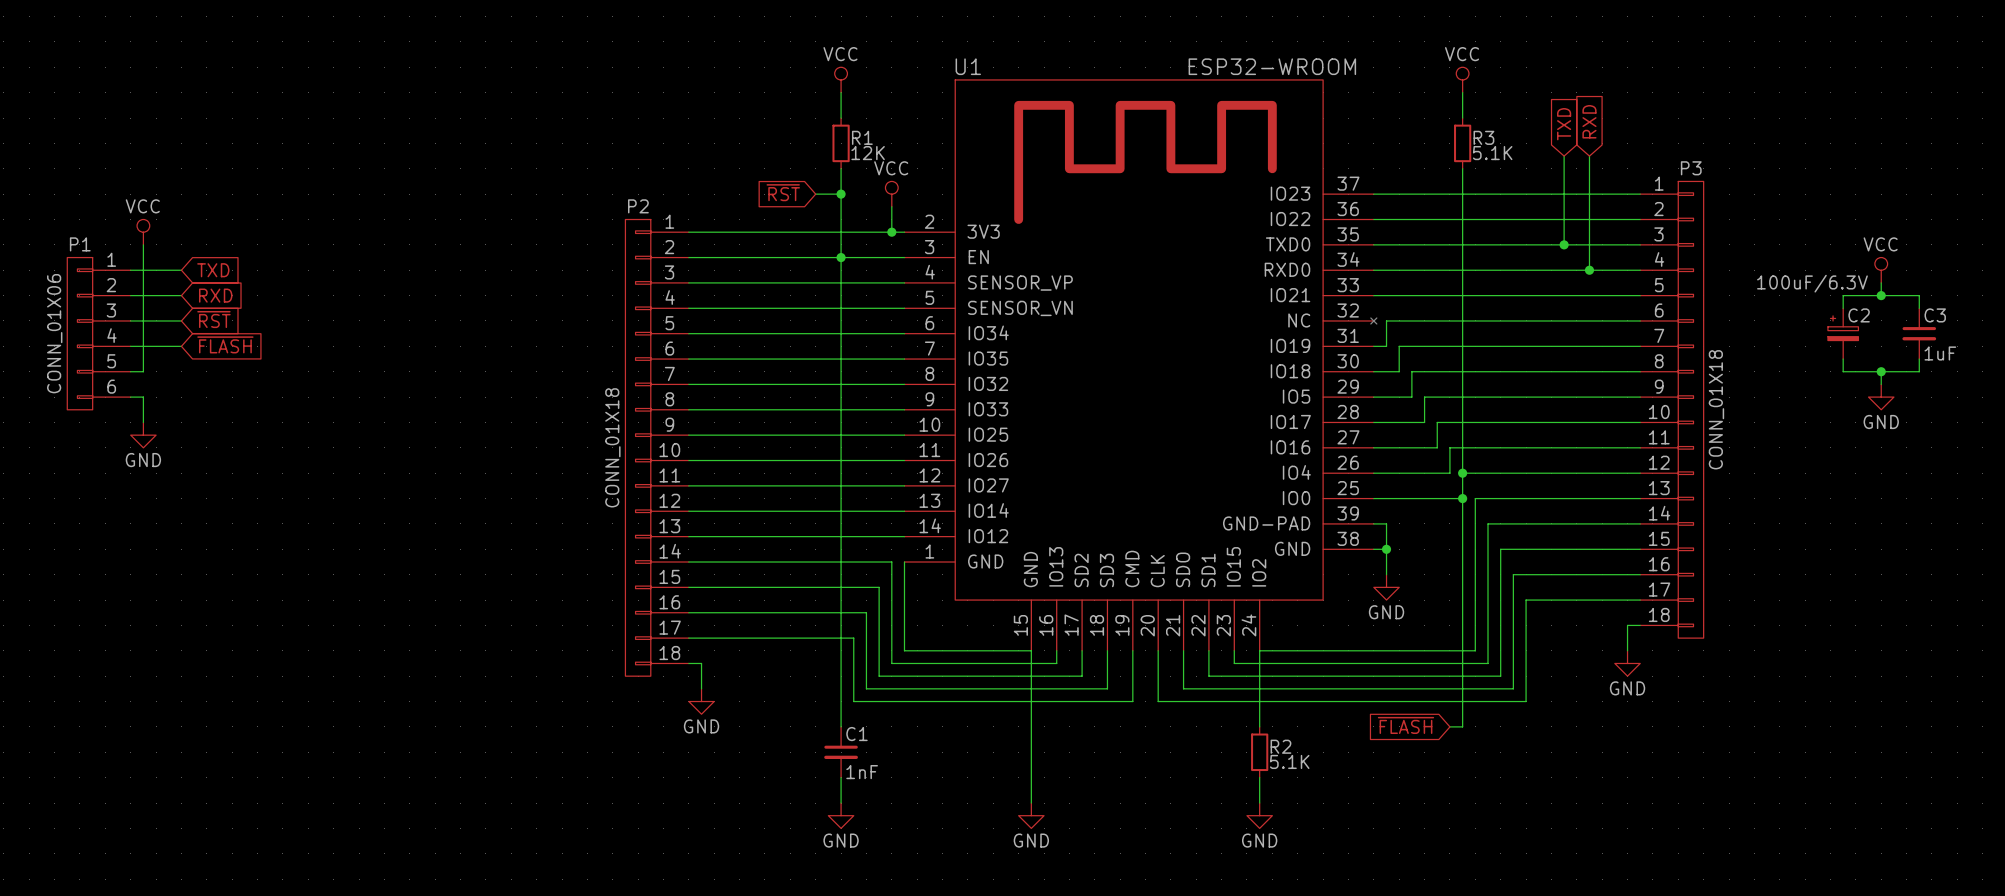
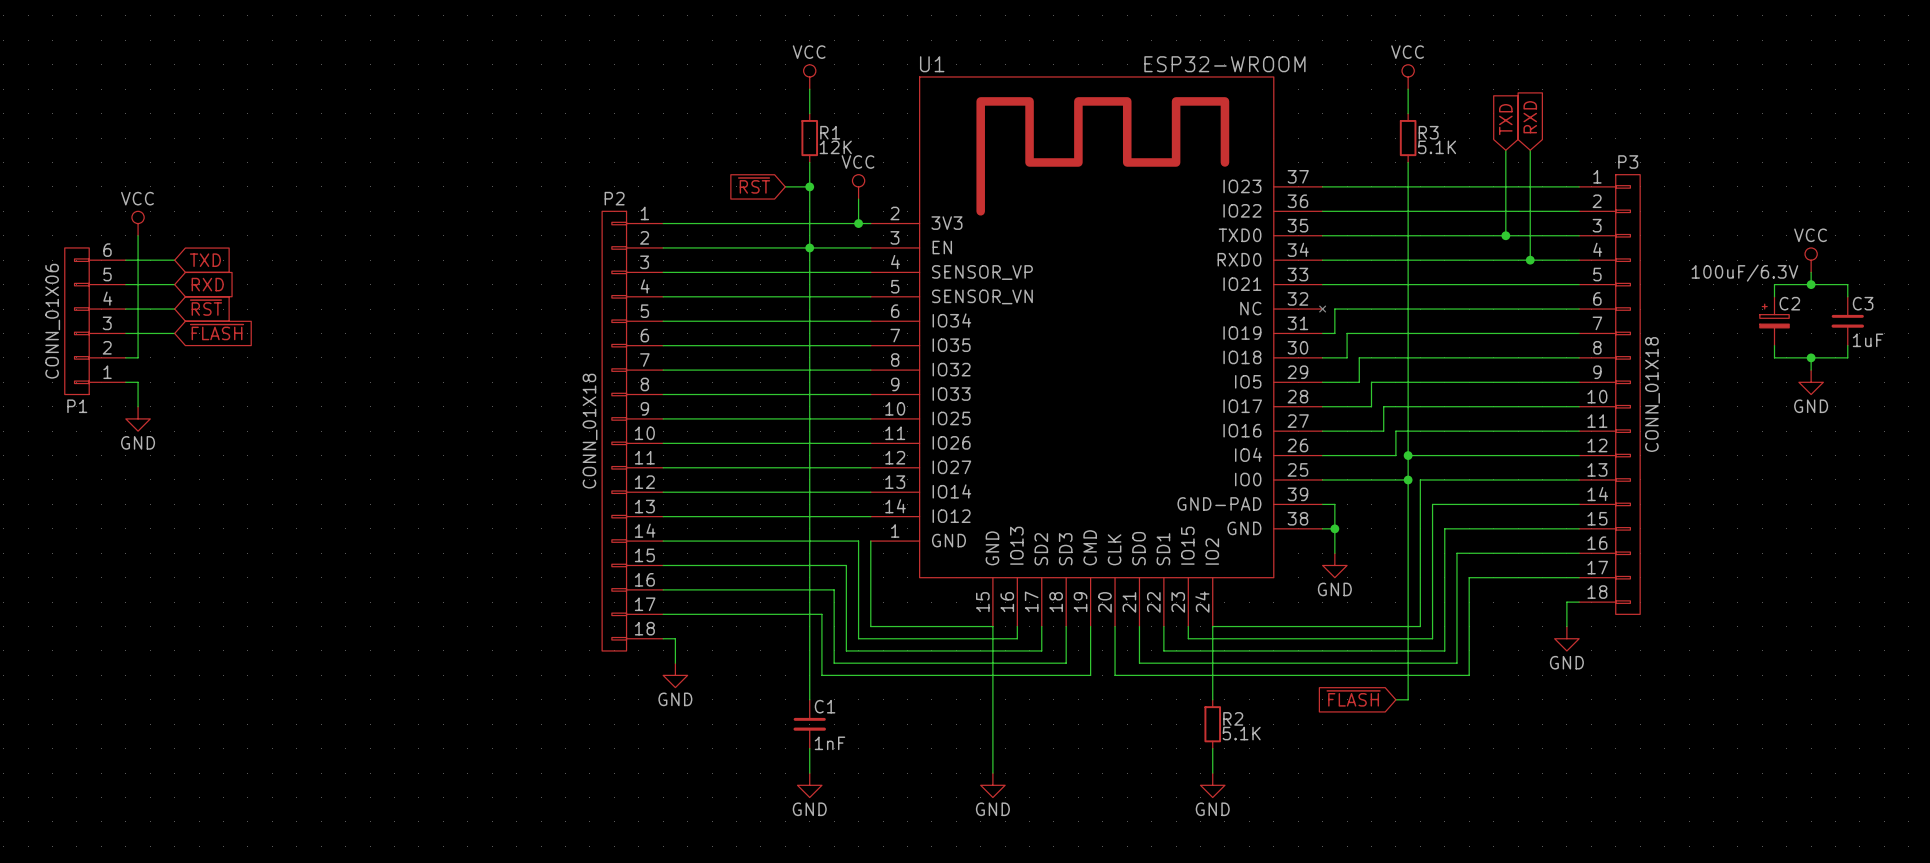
P1 flip: as is (79, 333) -> up-down (76, 321)

